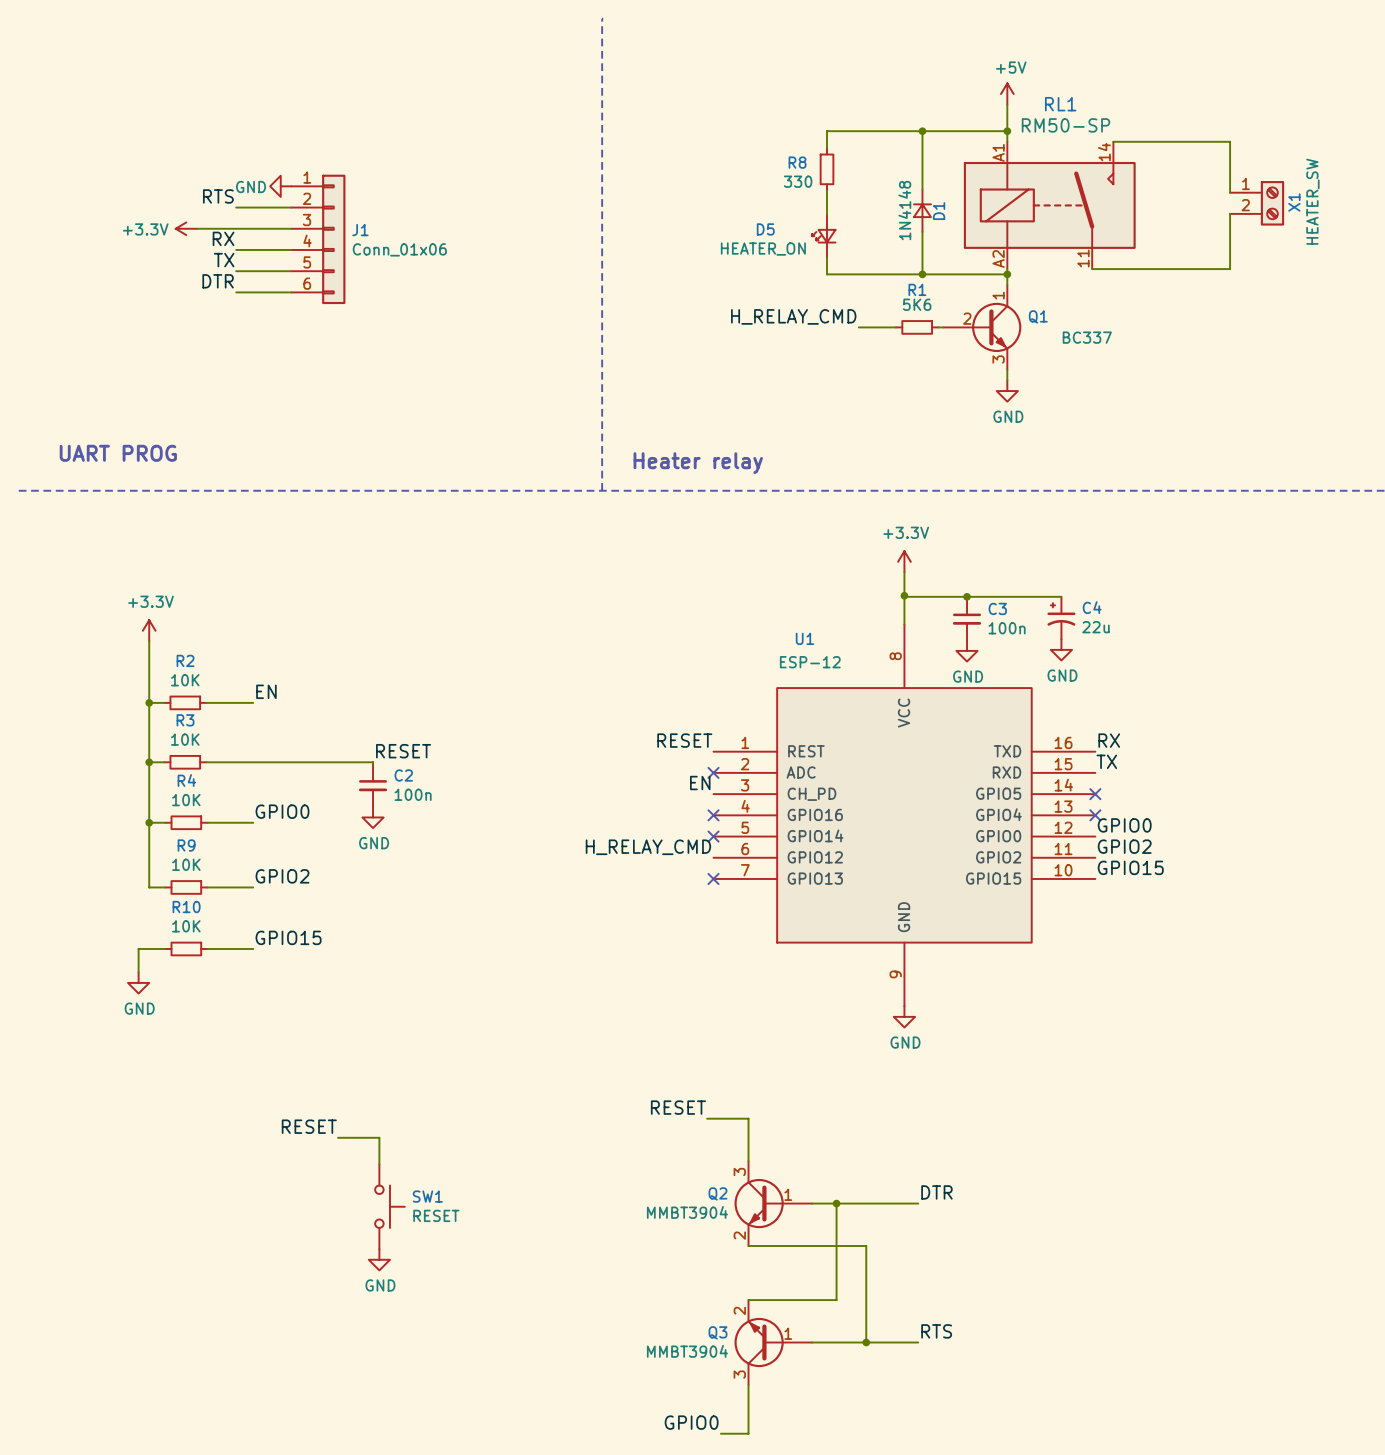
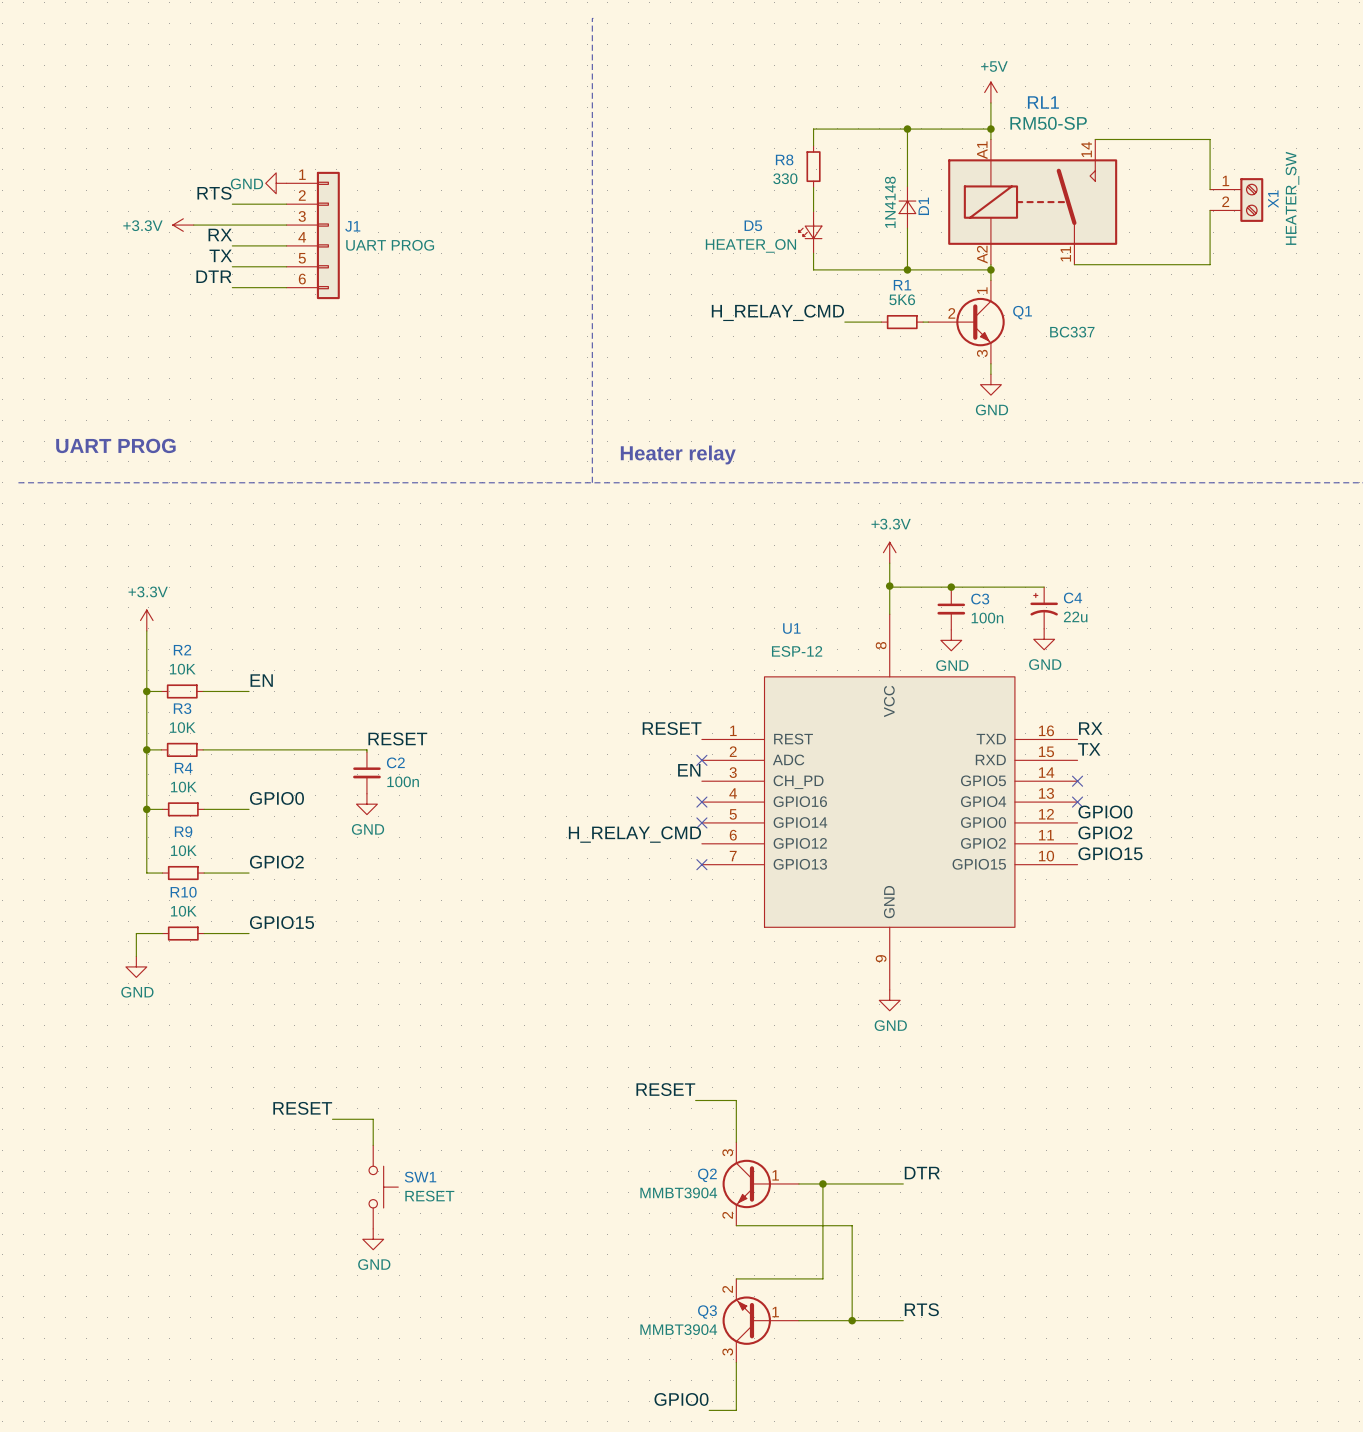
J1 value: Conn_01x06 (399, 249) -> UART PROG (390, 245)

